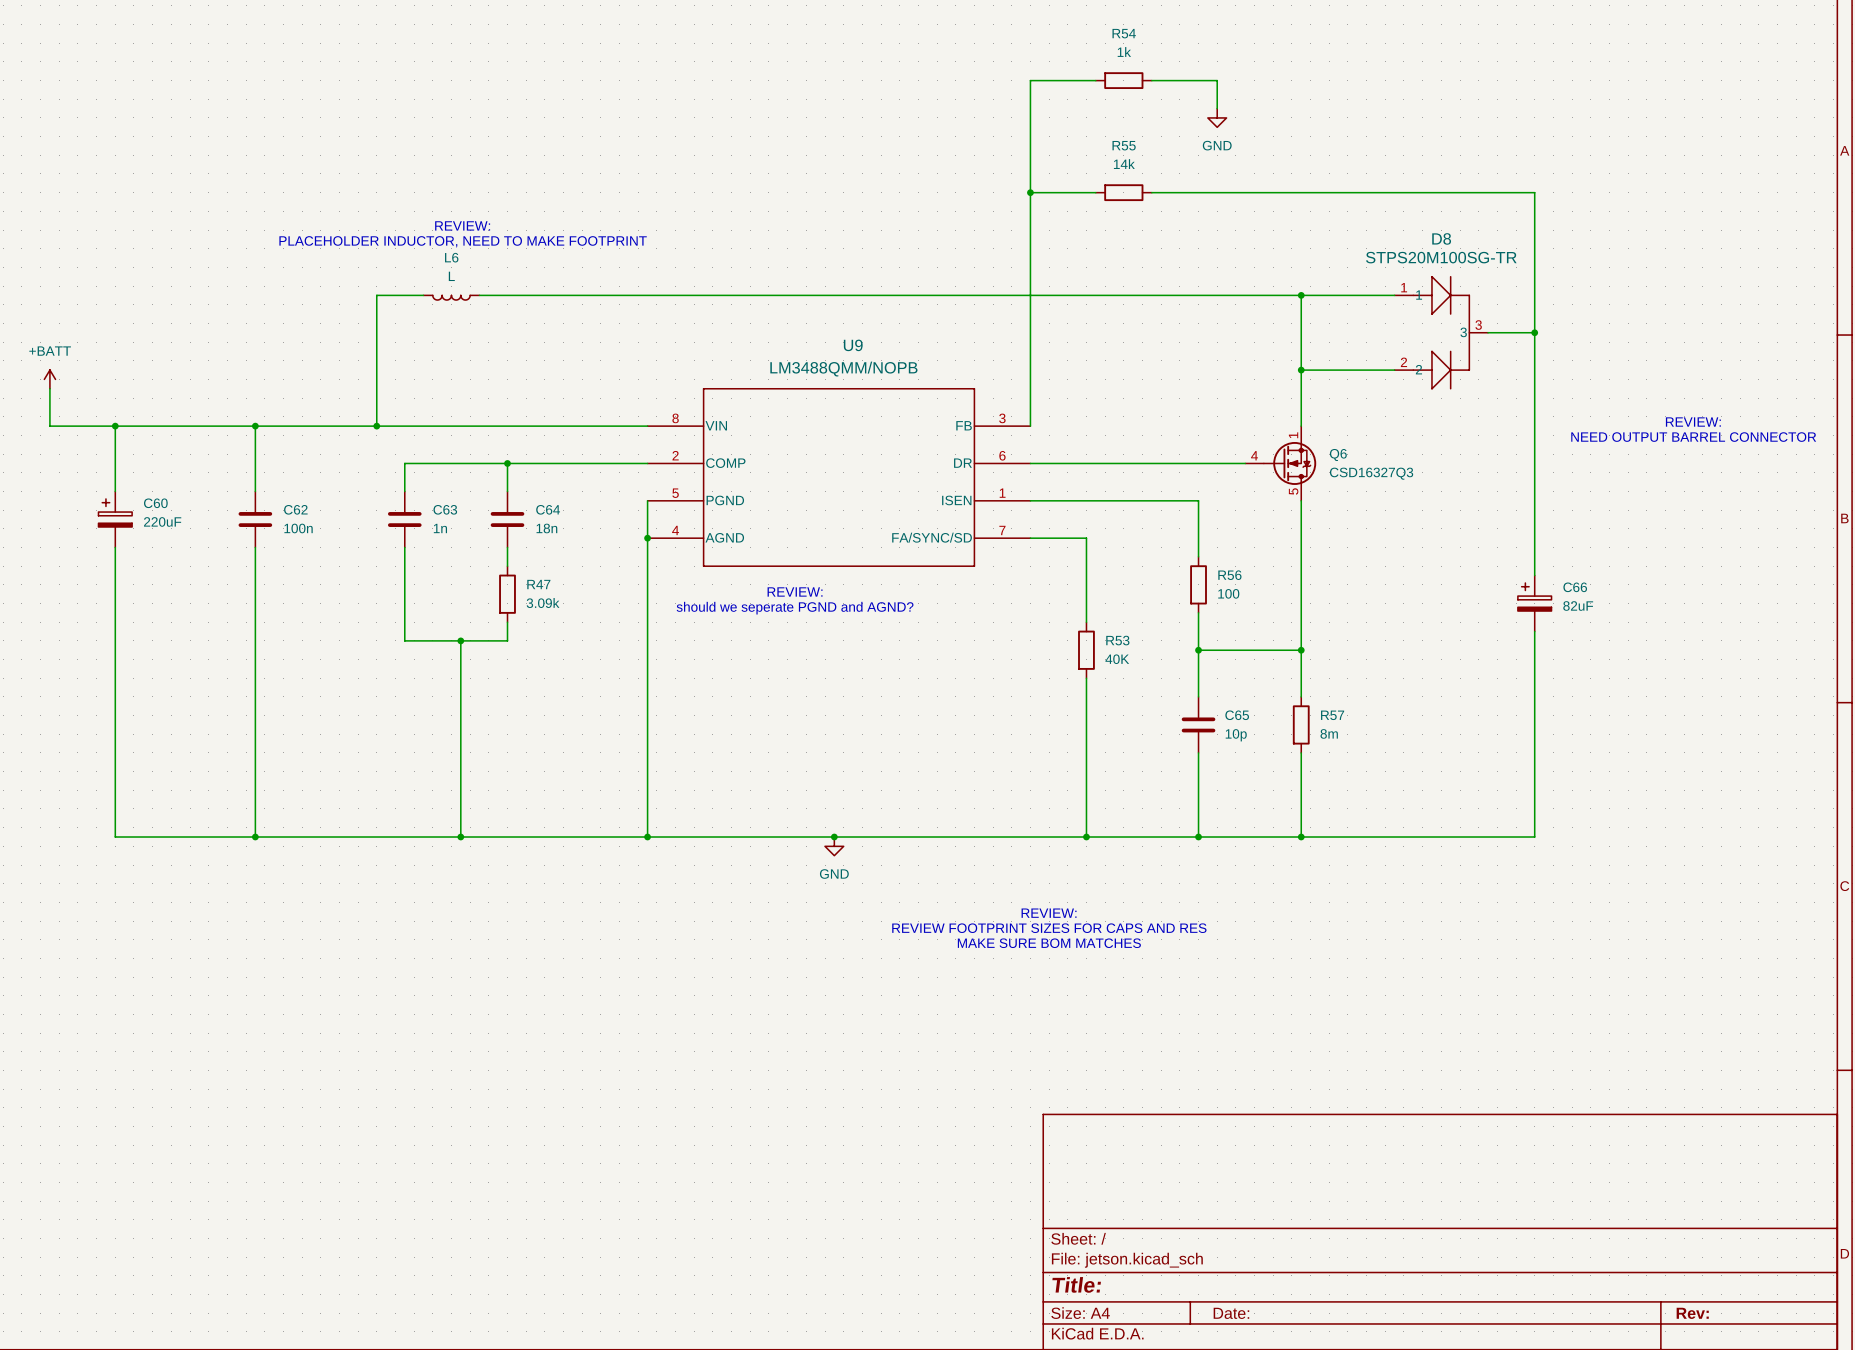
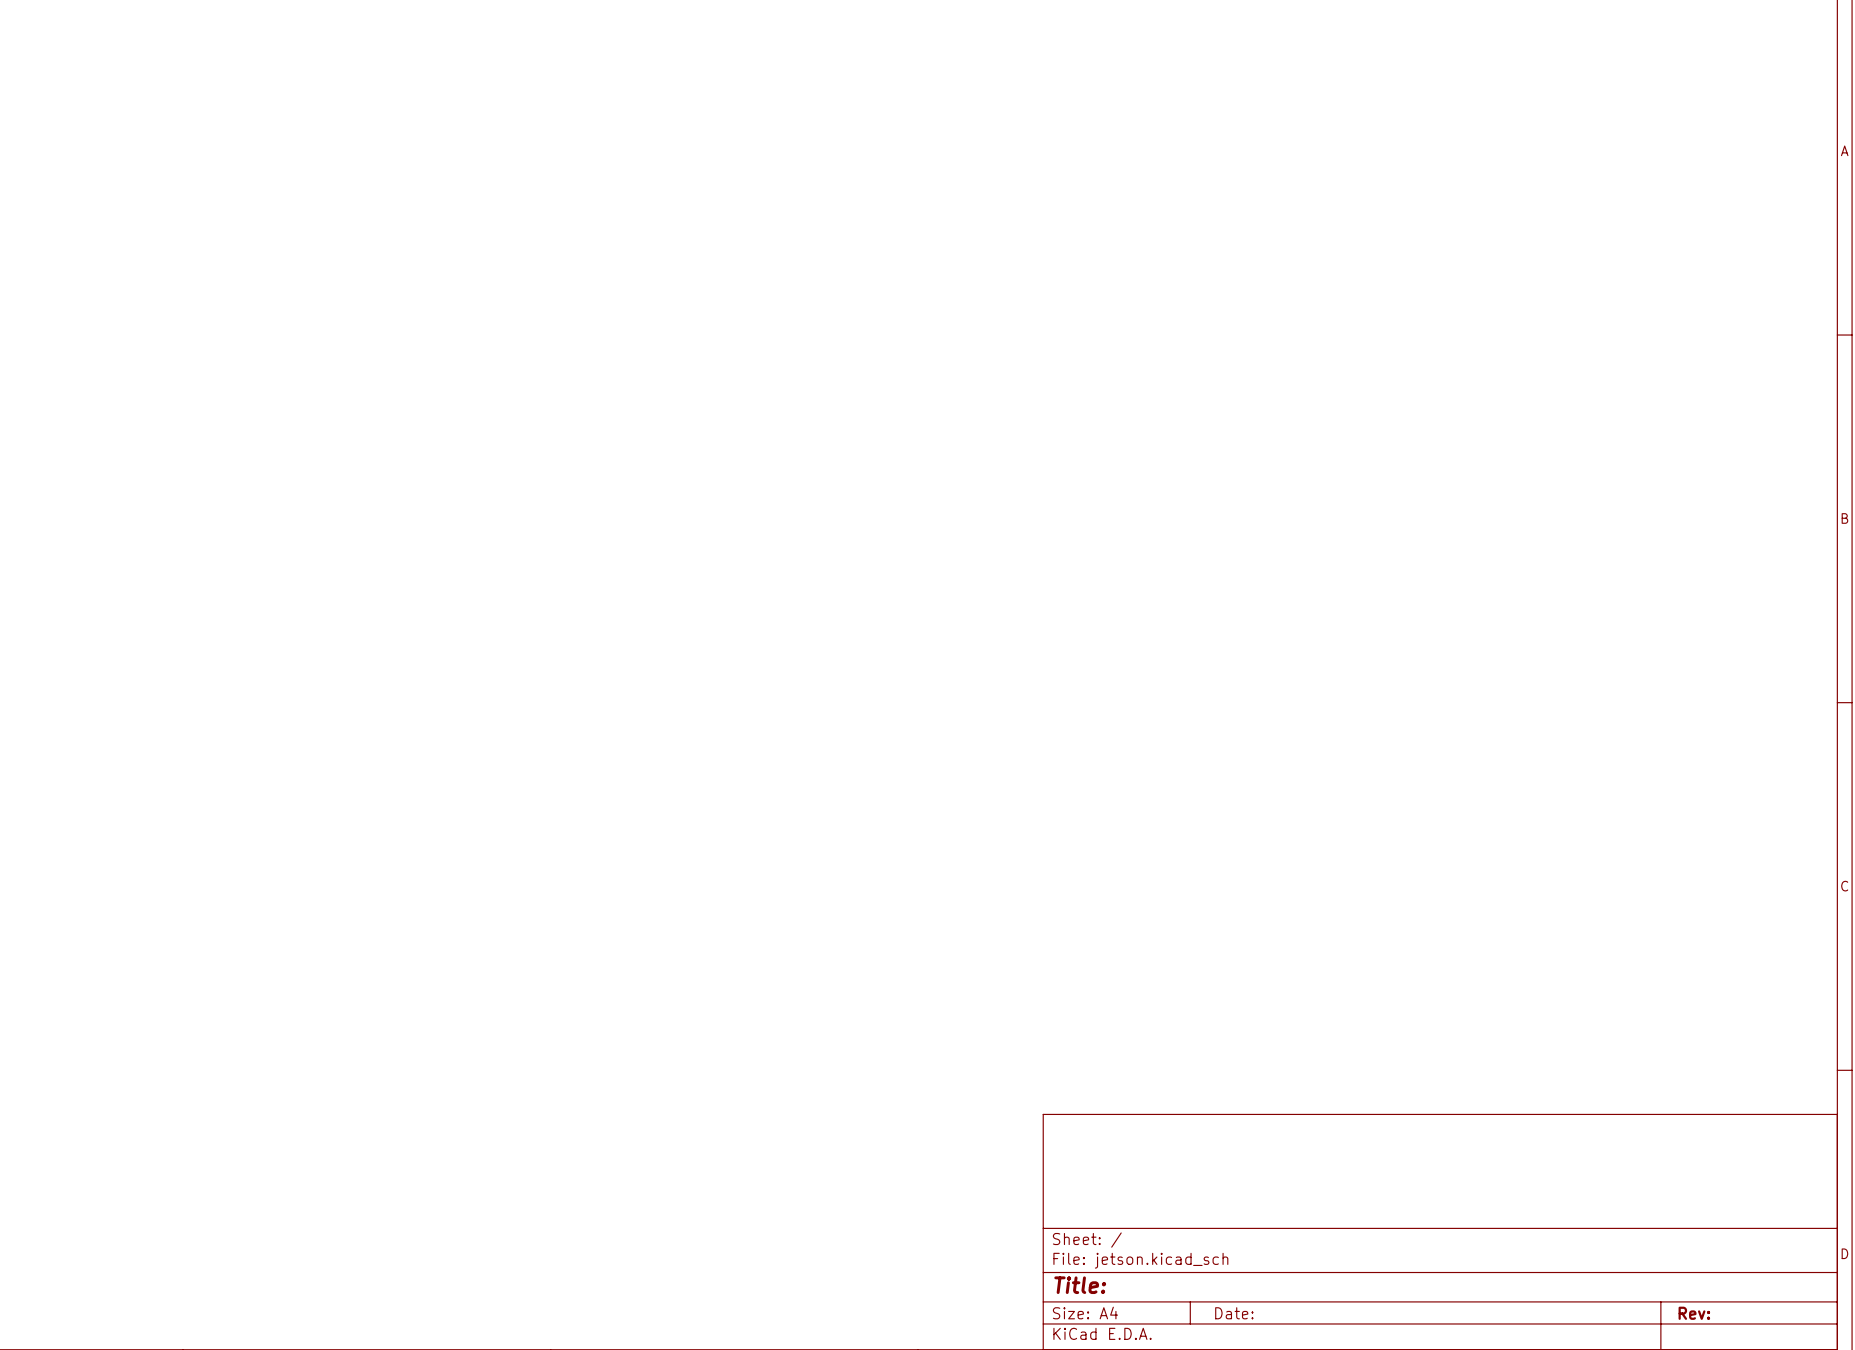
wire: (1095, 80) (1030, 80) (1030, 426) -> none
R54: 1k (1123, 80) -> none
wire: (1151, 80) (1217, 80) (1217, 108) -> none
power symbol: GND (1217, 117) -> none
wire: (1030, 192) (1095, 192) -> none
junction: (1030, 192) -> none
R55: 14k (1123, 192) -> none
wire: (1151, 192) (1534, 192) (1534, 575) -> none
text: REVIEW: (462, 225) -> none
text: PLACEHOLDER INDUCTOR, NEED TO MAKE FOOTPRINT (463, 241) -> none
wire: (423, 295) (376, 295) (376, 426) -> none
wire: (479, 295) (1394, 295) -> none
wire: (1301, 295) (1301, 426) -> none
junction: (1301, 295) -> none
L6: L (451, 297) -> none
D8: STPS20M100SG-TR (1441, 332) -> none
wire: (1488, 332) (1534, 332) -> none
junction: (1534, 332) -> none
wire: (1301, 370) (1394, 370) -> none
junction: (1301, 370) -> none
power symbol: +BATT (49, 379) -> none
wire: (49, 388) (49, 426) (647, 426) -> none
text: REVIEW: (1693, 422) -> none
wire: (115, 426) (115, 491) -> none
junction: (115, 426) -> none
wire: (255, 426) (255, 491) -> none
junction: (255, 426) -> none
junction: (376, 426) -> none
text: NEED OUTPUT BARREL CONNECTOR (1693, 437) -> none
wire: (507, 463) (507, 491) -> none
junction: (507, 463) -> none
wire: (647, 463) (404, 463) (404, 491) -> none
wire: (1030, 463) (1245, 463) -> none
Q6: CSD16327Q3 (1280, 463) -> none
U9: LM3488QMM/NOPB (839, 477) -> none
wire: (647, 500) (647, 837) -> none
wire: (1030, 500) (1198, 500) (1198, 556) -> none
wire: (1301, 500) (1301, 696) -> none
C60: 220uF (115, 519) -> none
C62: 100n (255, 519) -> none
C63: 1n (404, 519) -> none
C64: 18n (507, 519) -> none
junction: (647, 538) -> none
wire: (1030, 538) (1086, 538) (1086, 622) -> none
wire: (115, 547) (115, 837) (1534, 837) (1534, 631) -> none
wire: (255, 547) (255, 837) -> none
wire: (404, 547) (404, 640) (507, 640) (507, 622) -> none
wire: (507, 547) (507, 566) -> none
R56: 100 (1198, 584) -> none
text: REVIEW: (795, 591) -> none
R47: 3.09k (507, 594) -> none
C66: 82uF (1534, 603) -> none
text: should we seperate PGND and AGND? (795, 608) -> none
wire: (1198, 612) (1198, 696) -> none
wire: (460, 640) (460, 837) -> none
junction: (460, 640) -> none
R53: 40K (1086, 650) -> none
wire: (1198, 650) (1301, 650) -> none
junction: (1198, 650) -> none
junction: (1301, 650) -> none
wire: (1086, 678) (1086, 837) -> none
C65: 10p (1198, 724) -> none
R57: 8m (1301, 724) -> none
wire: (1198, 752) (1198, 837) -> none
wire: (1301, 752) (1301, 837) -> none
junction: (255, 837) -> none
junction: (460, 837) -> none
junction: (647, 837) -> none
junction: (834, 837) -> none
junction: (1086, 837) -> none
junction: (1198, 837) -> none
junction: (1301, 837) -> none
power symbol: GND (834, 846) -> none
text: REVIEW: (1049, 913) -> none
text: REVIEW FOOTPRINT SIZES FOR CAPS AND RES (1049, 928) -> none
text: MAKE SURE BOM MATCHES (1049, 943) -> none

